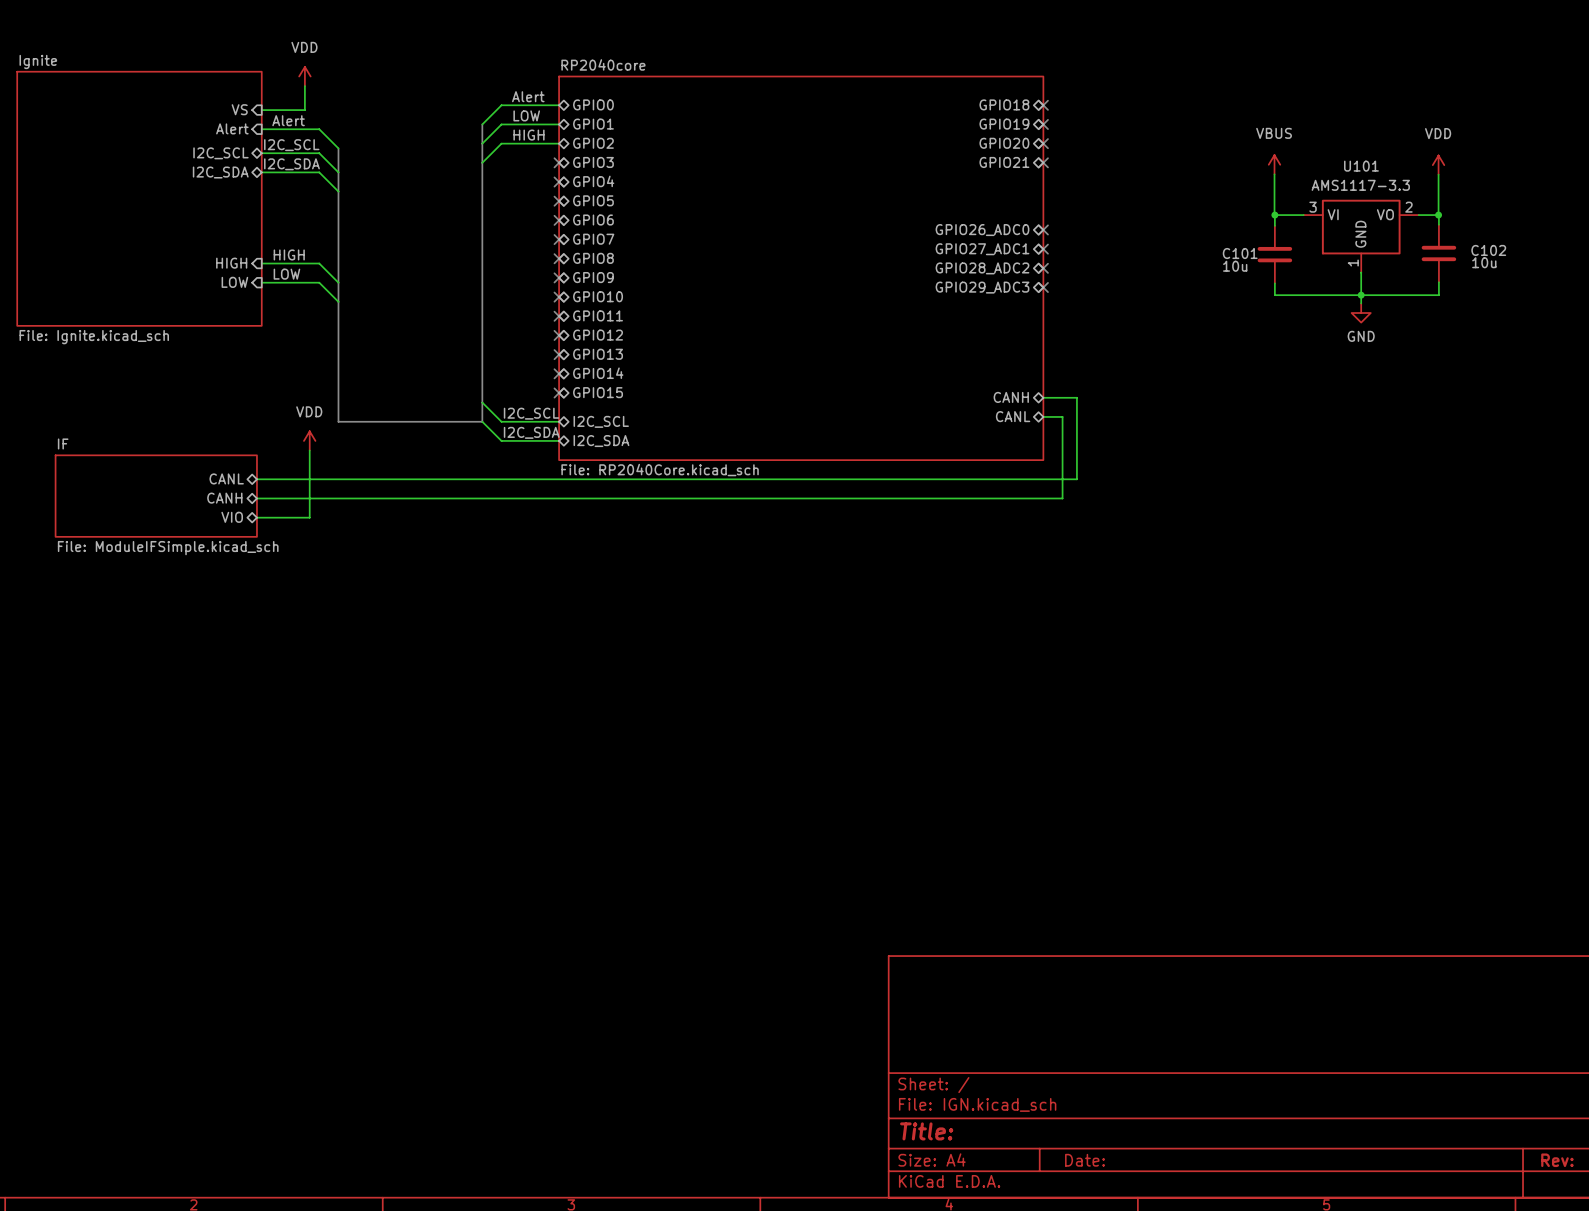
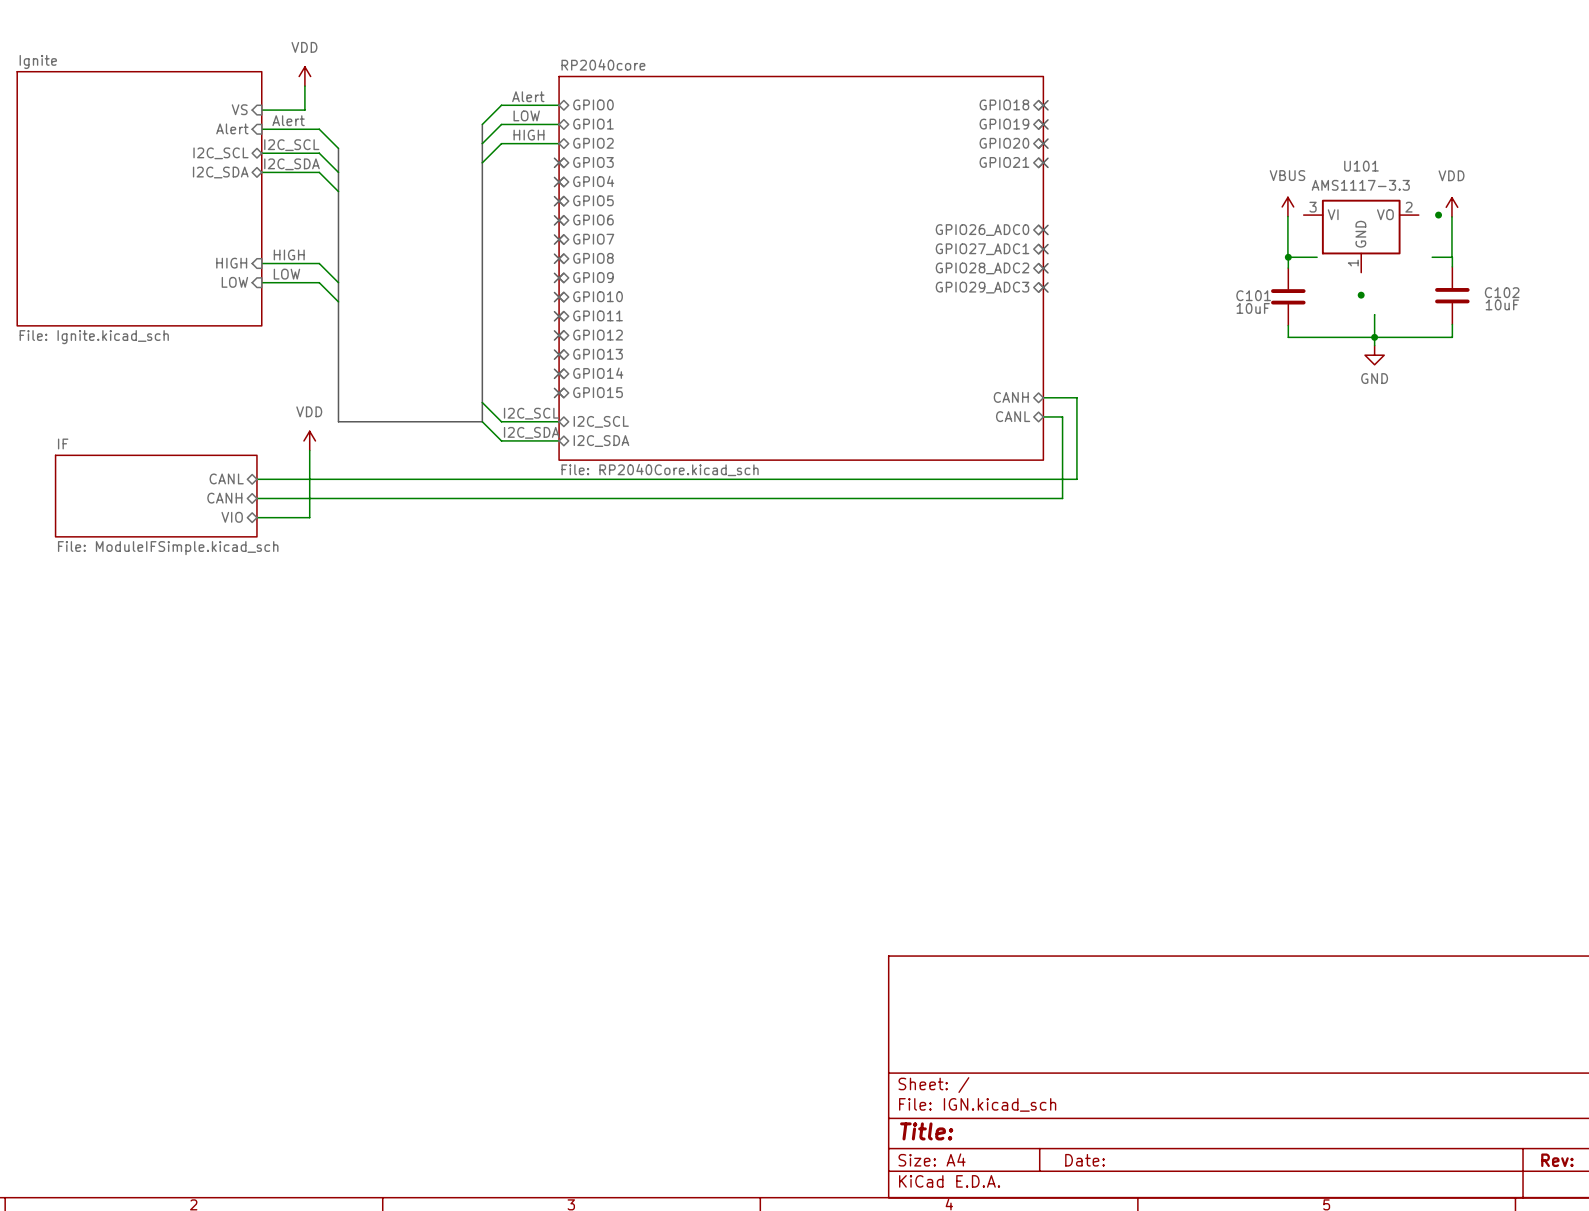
power symbol position: VBUS (1274, 164) -> VBUS (1287, 206)
power symbol position: VDD (1438, 165) -> VDD (1451, 207)
wire: (1274, 174) (1274, 215) (1303, 215) -> (1287, 216) (1287, 257) (1317, 257)
wire: (1438, 174) (1438, 215) -> (1451, 216) (1451, 257)
wire: (1274, 215) (1274, 225) -> (1288, 257) (1288, 268)
junction position: (1274, 215) -> (1288, 257)
wire: (1418, 215) (1438, 215) (1438, 224) -> (1432, 257) (1452, 257) (1452, 266)
C102 position: (1438, 253) -> (1452, 295)
C101 position: (1274, 254) -> (1288, 296)
C102 value: 10u (1484, 262) -> 10uF (1502, 304)
C101 value: 10u (1235, 266) -> 10uF (1253, 308)
wire: (1361, 272) (1361, 303) -> (1374, 314) (1374, 345)
wire: (1438, 282) (1438, 295) (1274, 295) (1274, 283) -> (1452, 324) (1452, 337) (1288, 337) (1288, 325)
power symbol position: GND (1361, 313) -> GND (1374, 355)
junction: none -> (1374, 337)

